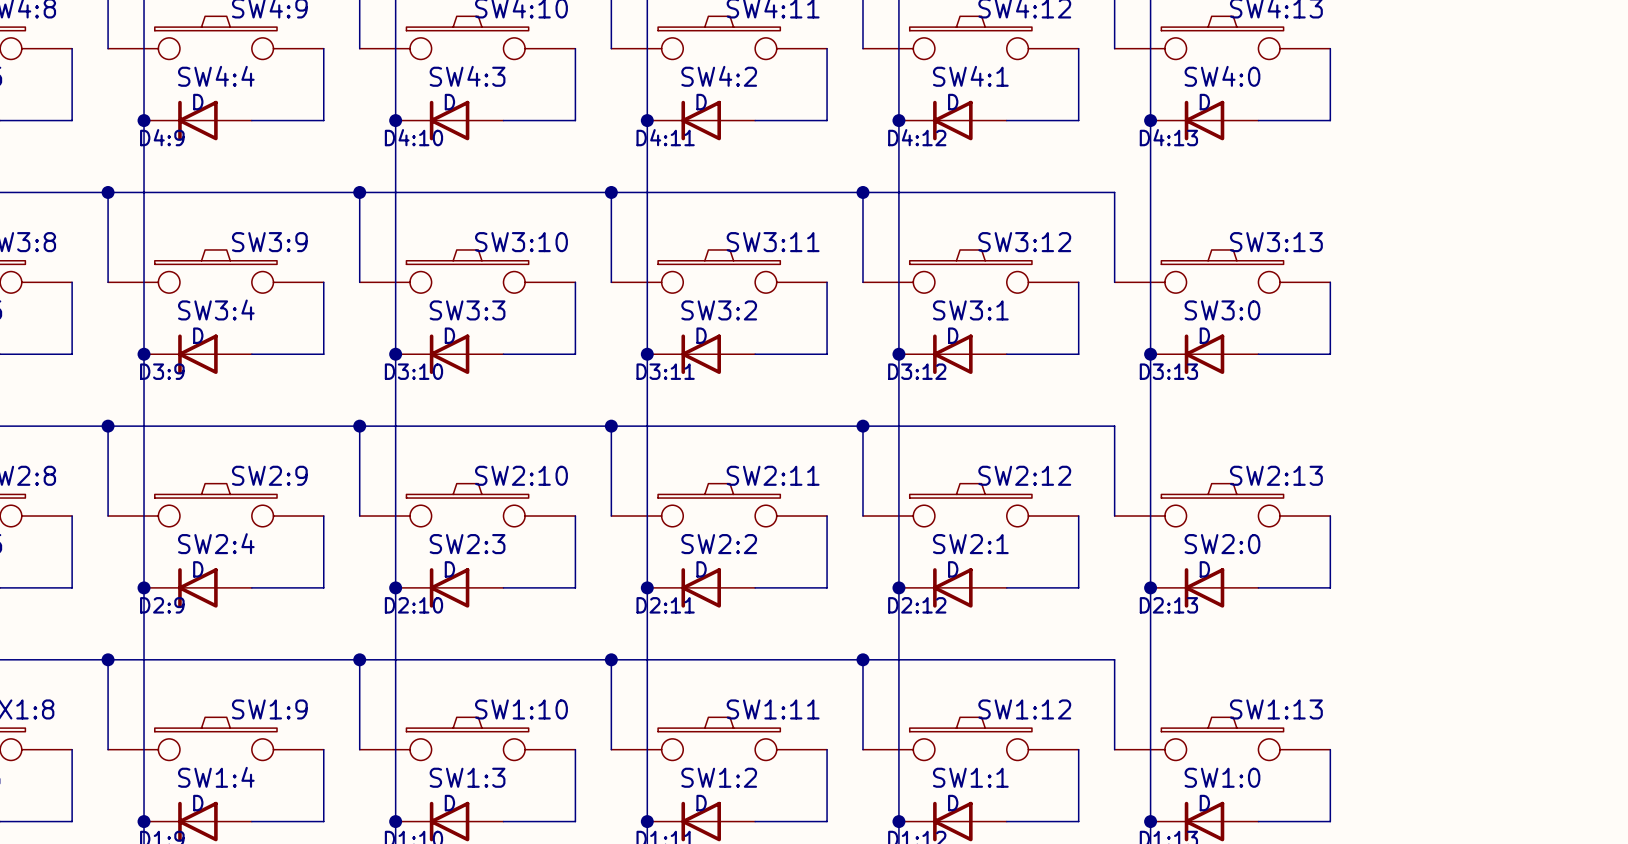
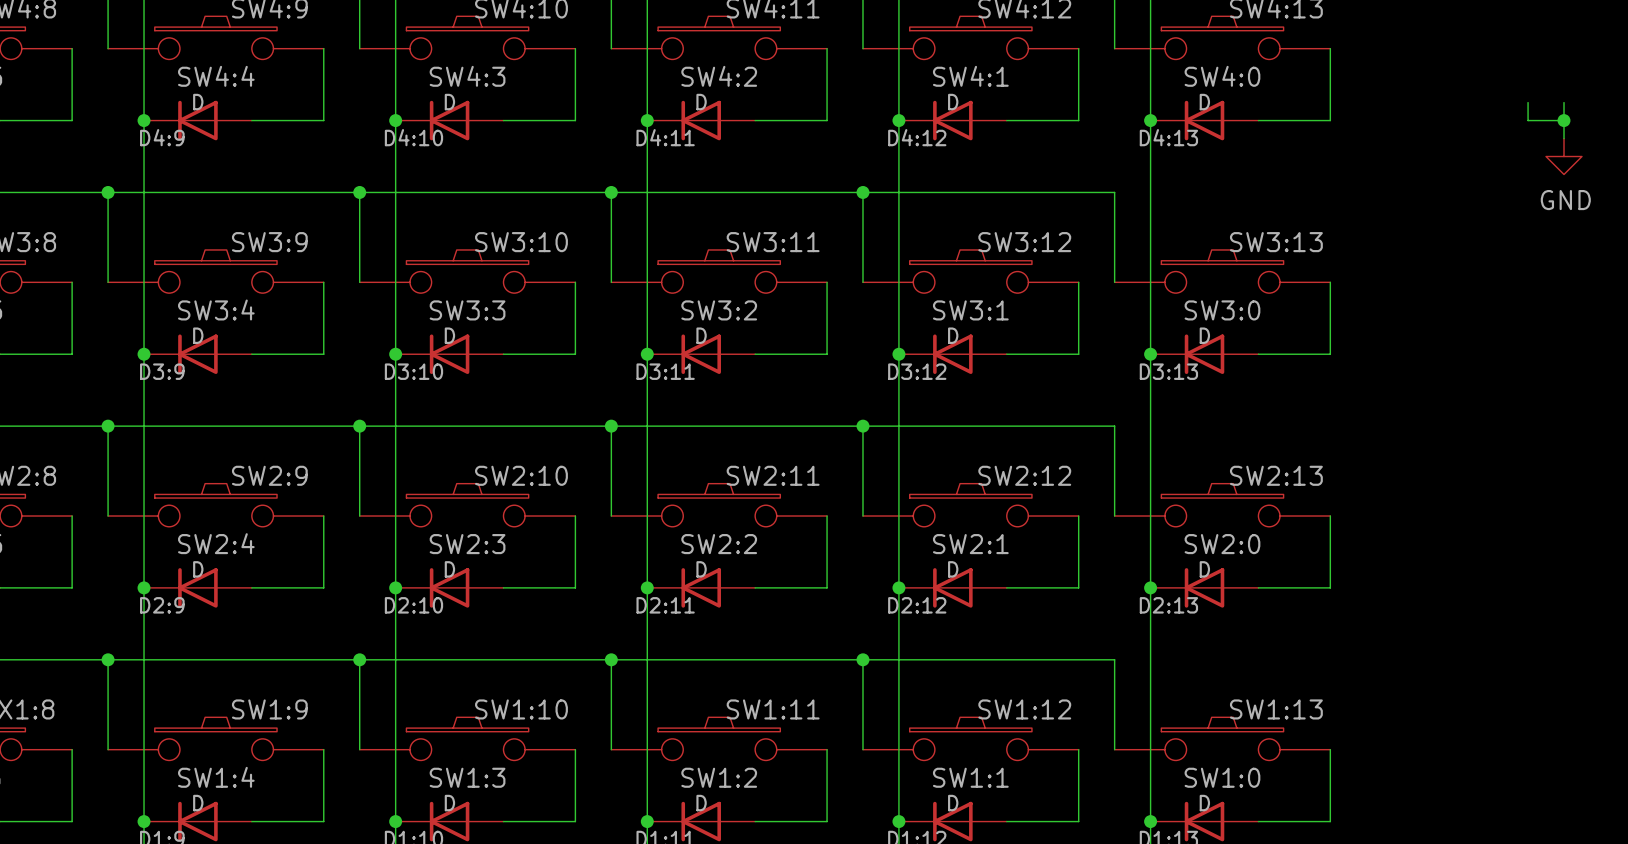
wire: none -> (1528, 102) (1528, 120) (1564, 120)
wire: none -> (1564, 102) (1564, 138)
junction: none -> (1564, 120)
power symbol: none -> GND (1564, 156)

